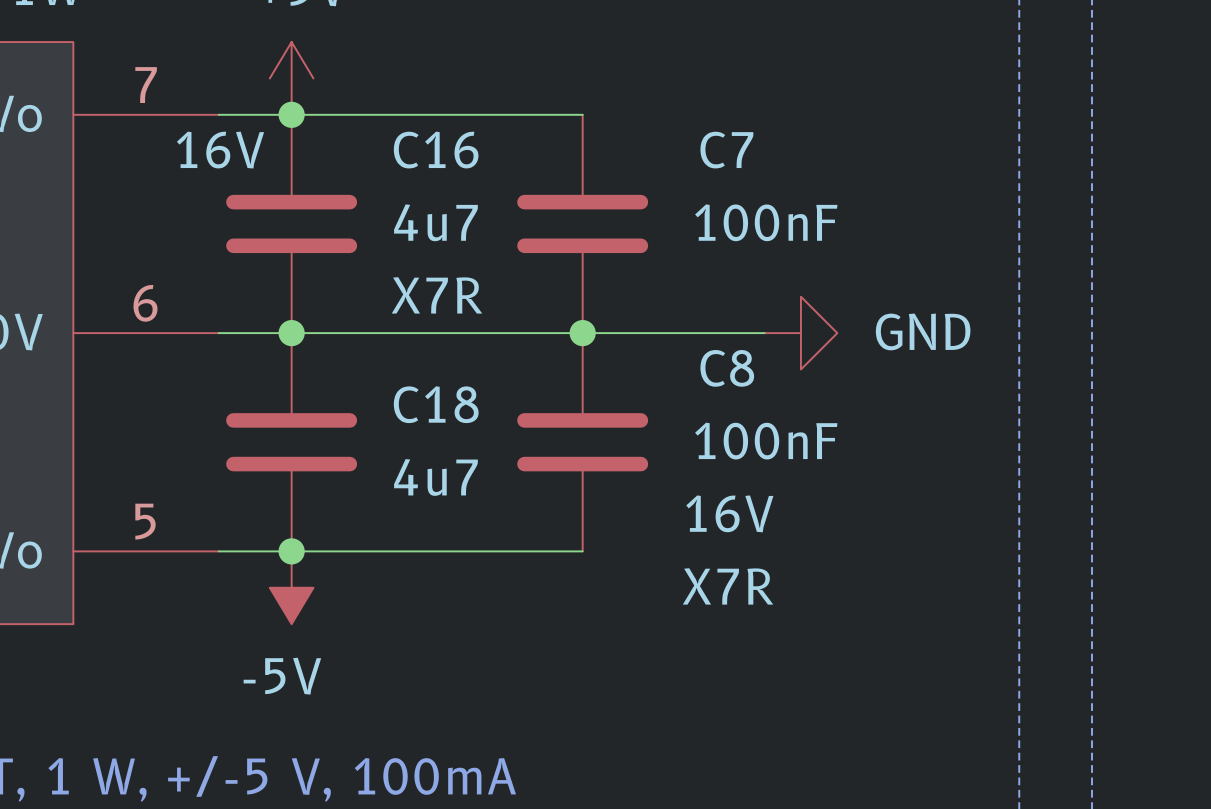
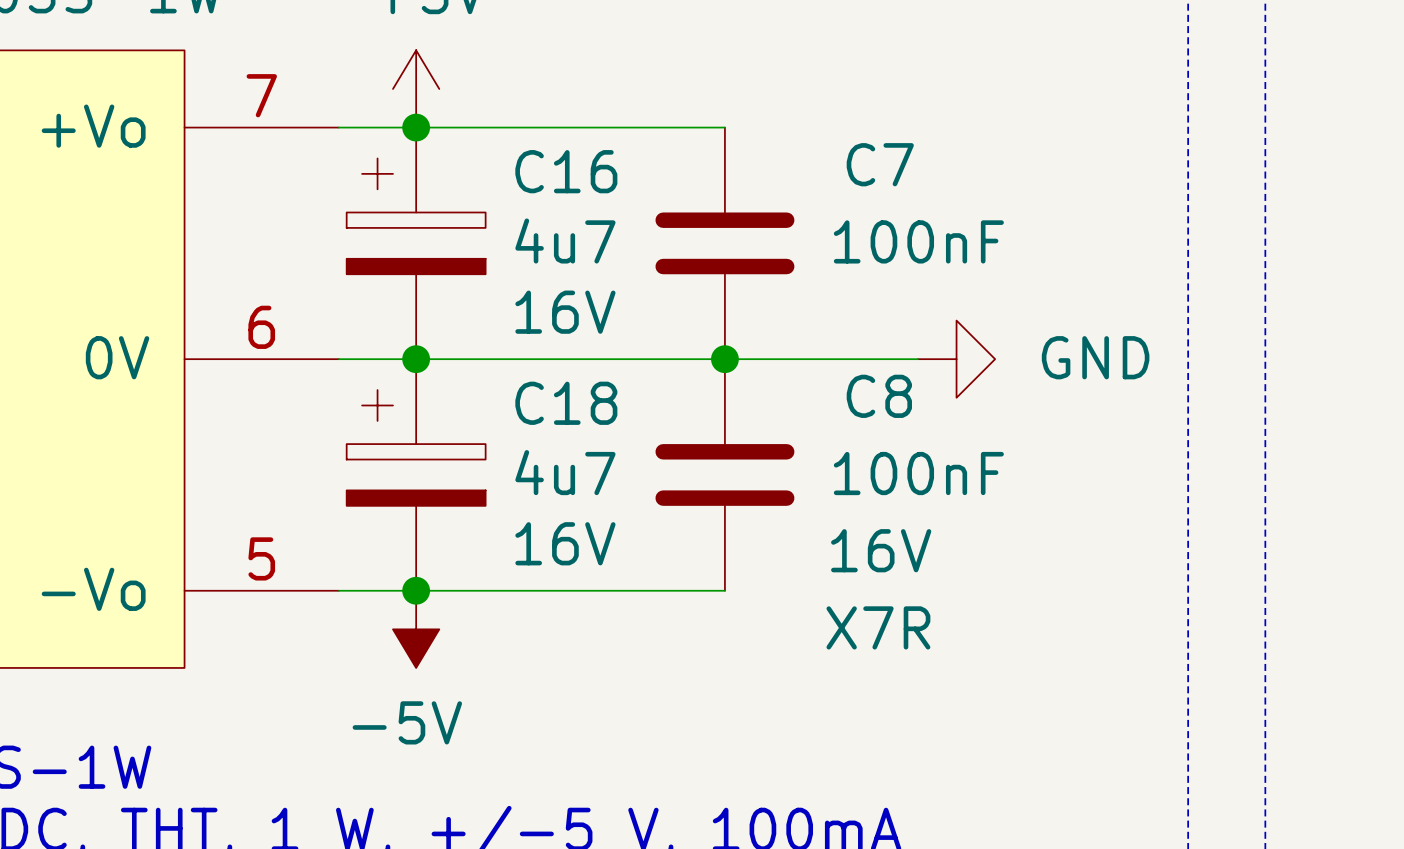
C16 symbol: [226, 114, 358, 334] -> [346, 127, 486, 360]
C16 text position: 16V (220, 150) -> 16V (565, 312)
C16 text: X7R (436, 295) -> none
C18 symbol: [226, 333, 358, 552] -> [346, 359, 486, 591]
C18 text: none -> 16V (565, 543)

